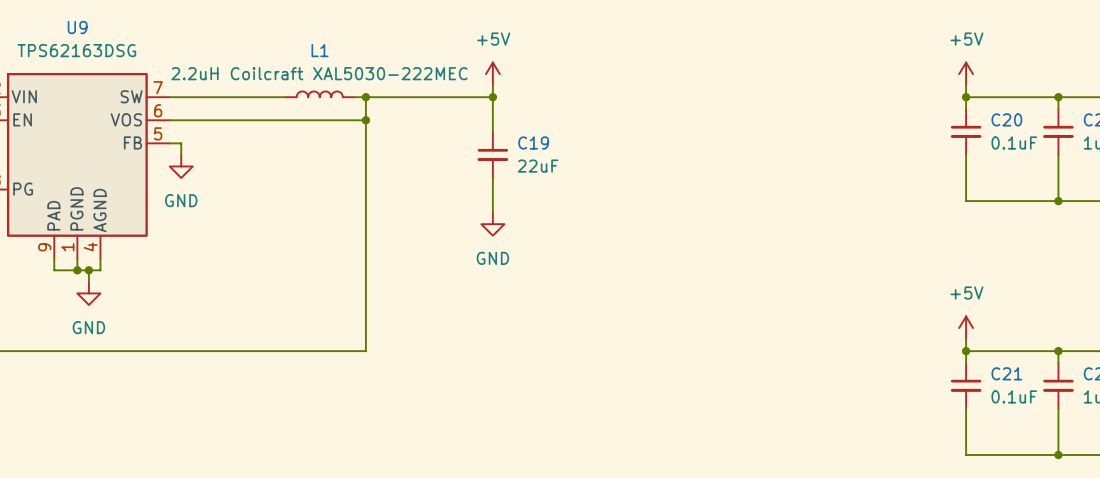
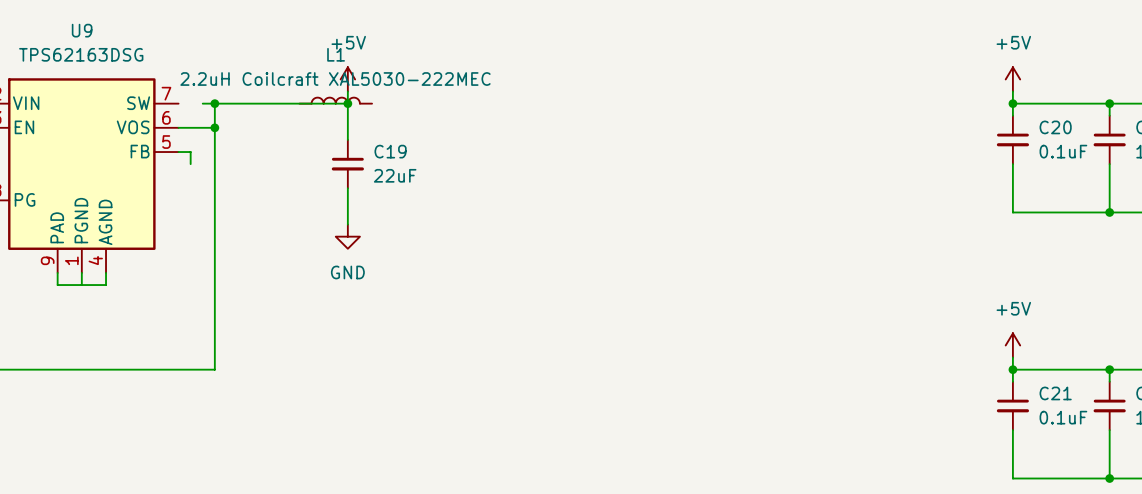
power symbol position: +5V (492, 74) -> +5V (347, 79)
wire: (492, 85) (492, 131) -> (347, 91) (347, 139)
wire: (169, 97) (192, 97) -> none
junction: none -> (214, 103)
wire: none -> (299, 103) (347, 103)
junction: none -> (347, 103)
wire: (354, 97) (492, 97) -> none
wire: (365, 97) (365, 351) (204, 351) -> (214, 103) (214, 369)
junction: (365, 97) -> none
junction: (492, 97) -> none
wire: (204, 120) (365, 120) -> none
junction: none -> (214, 127)
junction: (365, 120) -> none
C19 position: (492, 154) -> (347, 164)
power symbol: GND (181, 166) -> none
wire: (492, 177) (492, 212) -> (347, 188) (347, 224)
power symbol: none -> GND (347, 236)
power symbol: GND (492, 224) -> none
junction: (77, 270) -> none
wire: (88, 270) (88, 281) -> none
junction: (88, 270) -> none
power symbol: GND (88, 293) -> none

